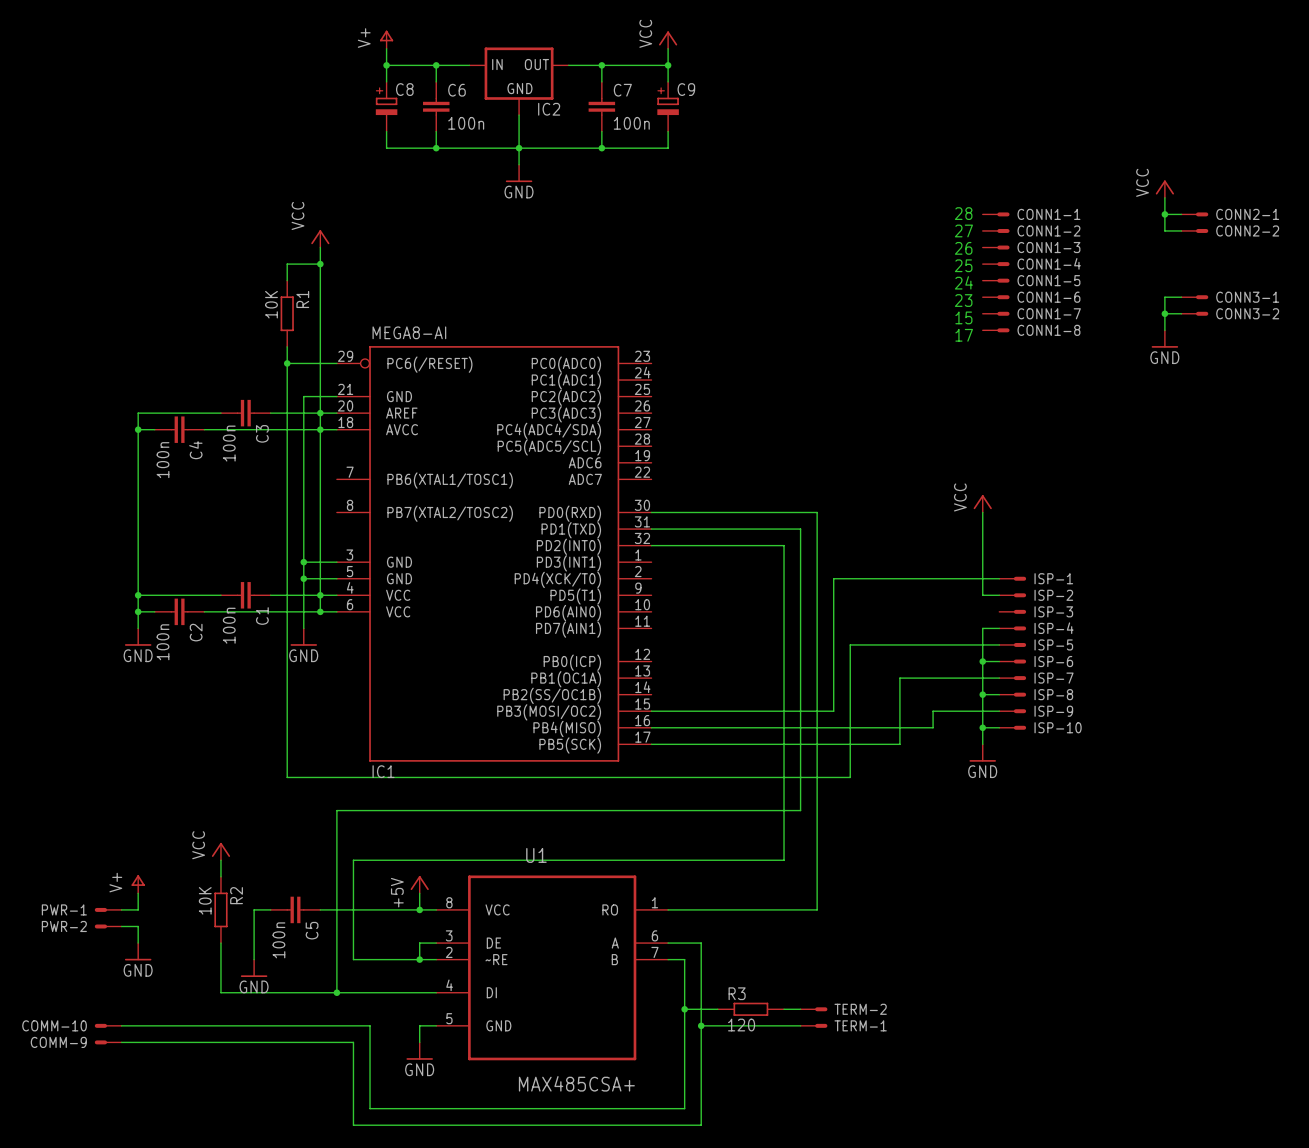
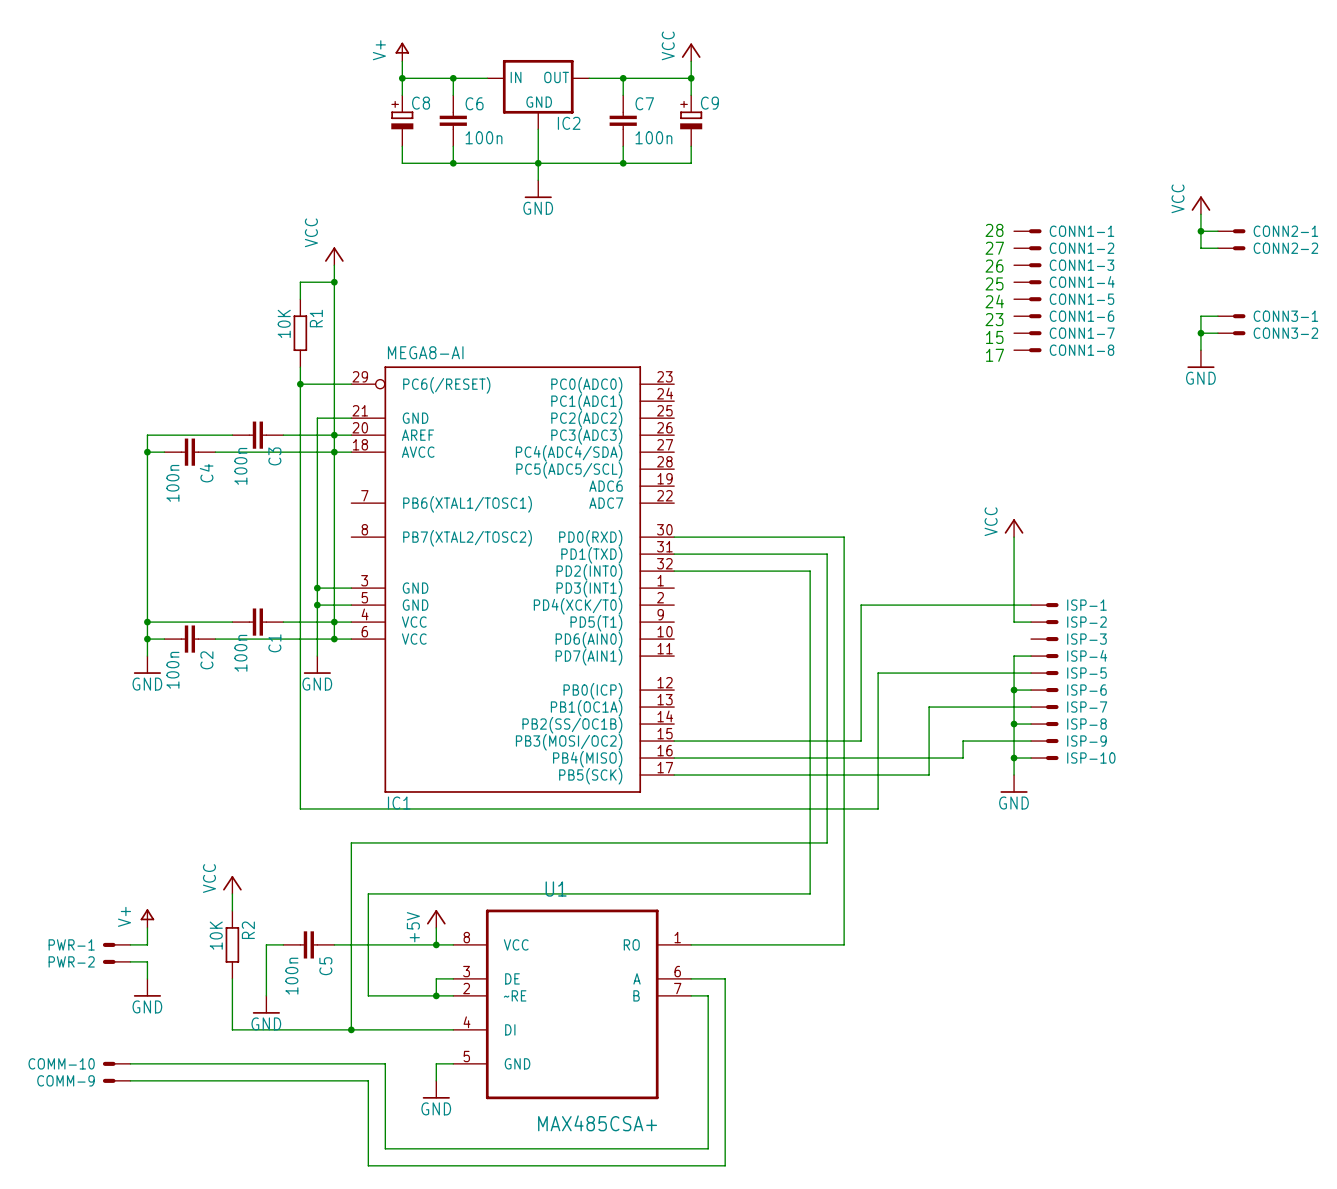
wire: (684, 1009) (717, 1009) -> none
junction: (684, 1009) -> none
R3: 120 (750, 1009) -> none
wire: (784, 1009) (800, 1009) -> none
TERM-2: (813, 1009) -> none
wire: (701, 1025) (800, 1025) -> none
junction: (701, 1025) -> none
TERM-1: (813, 1025) -> none

